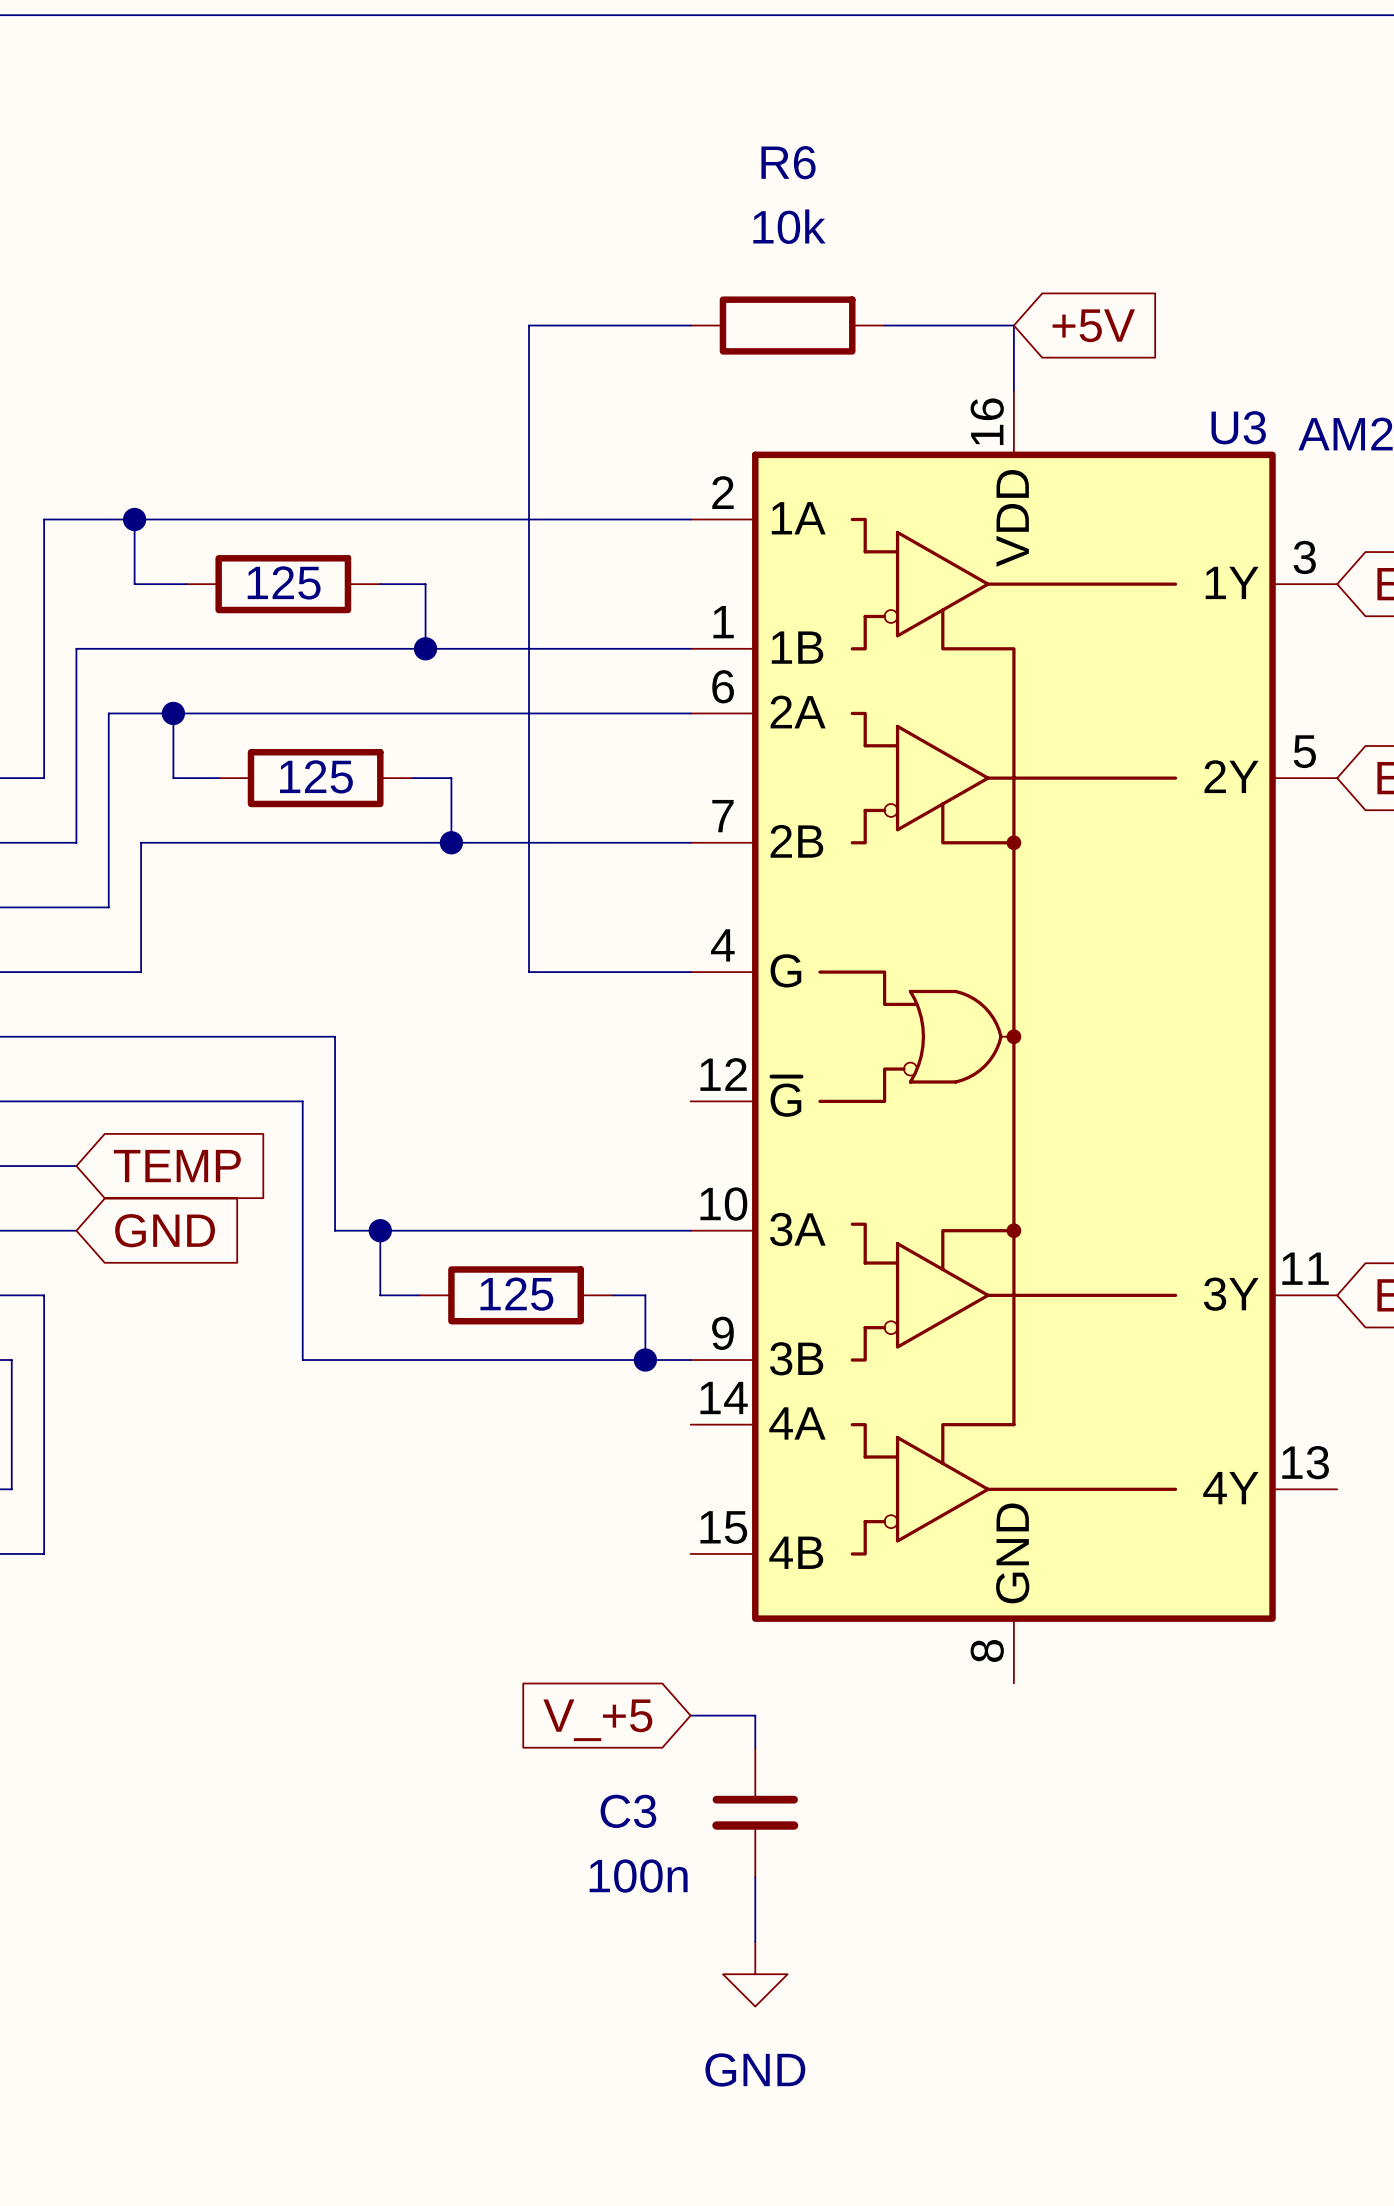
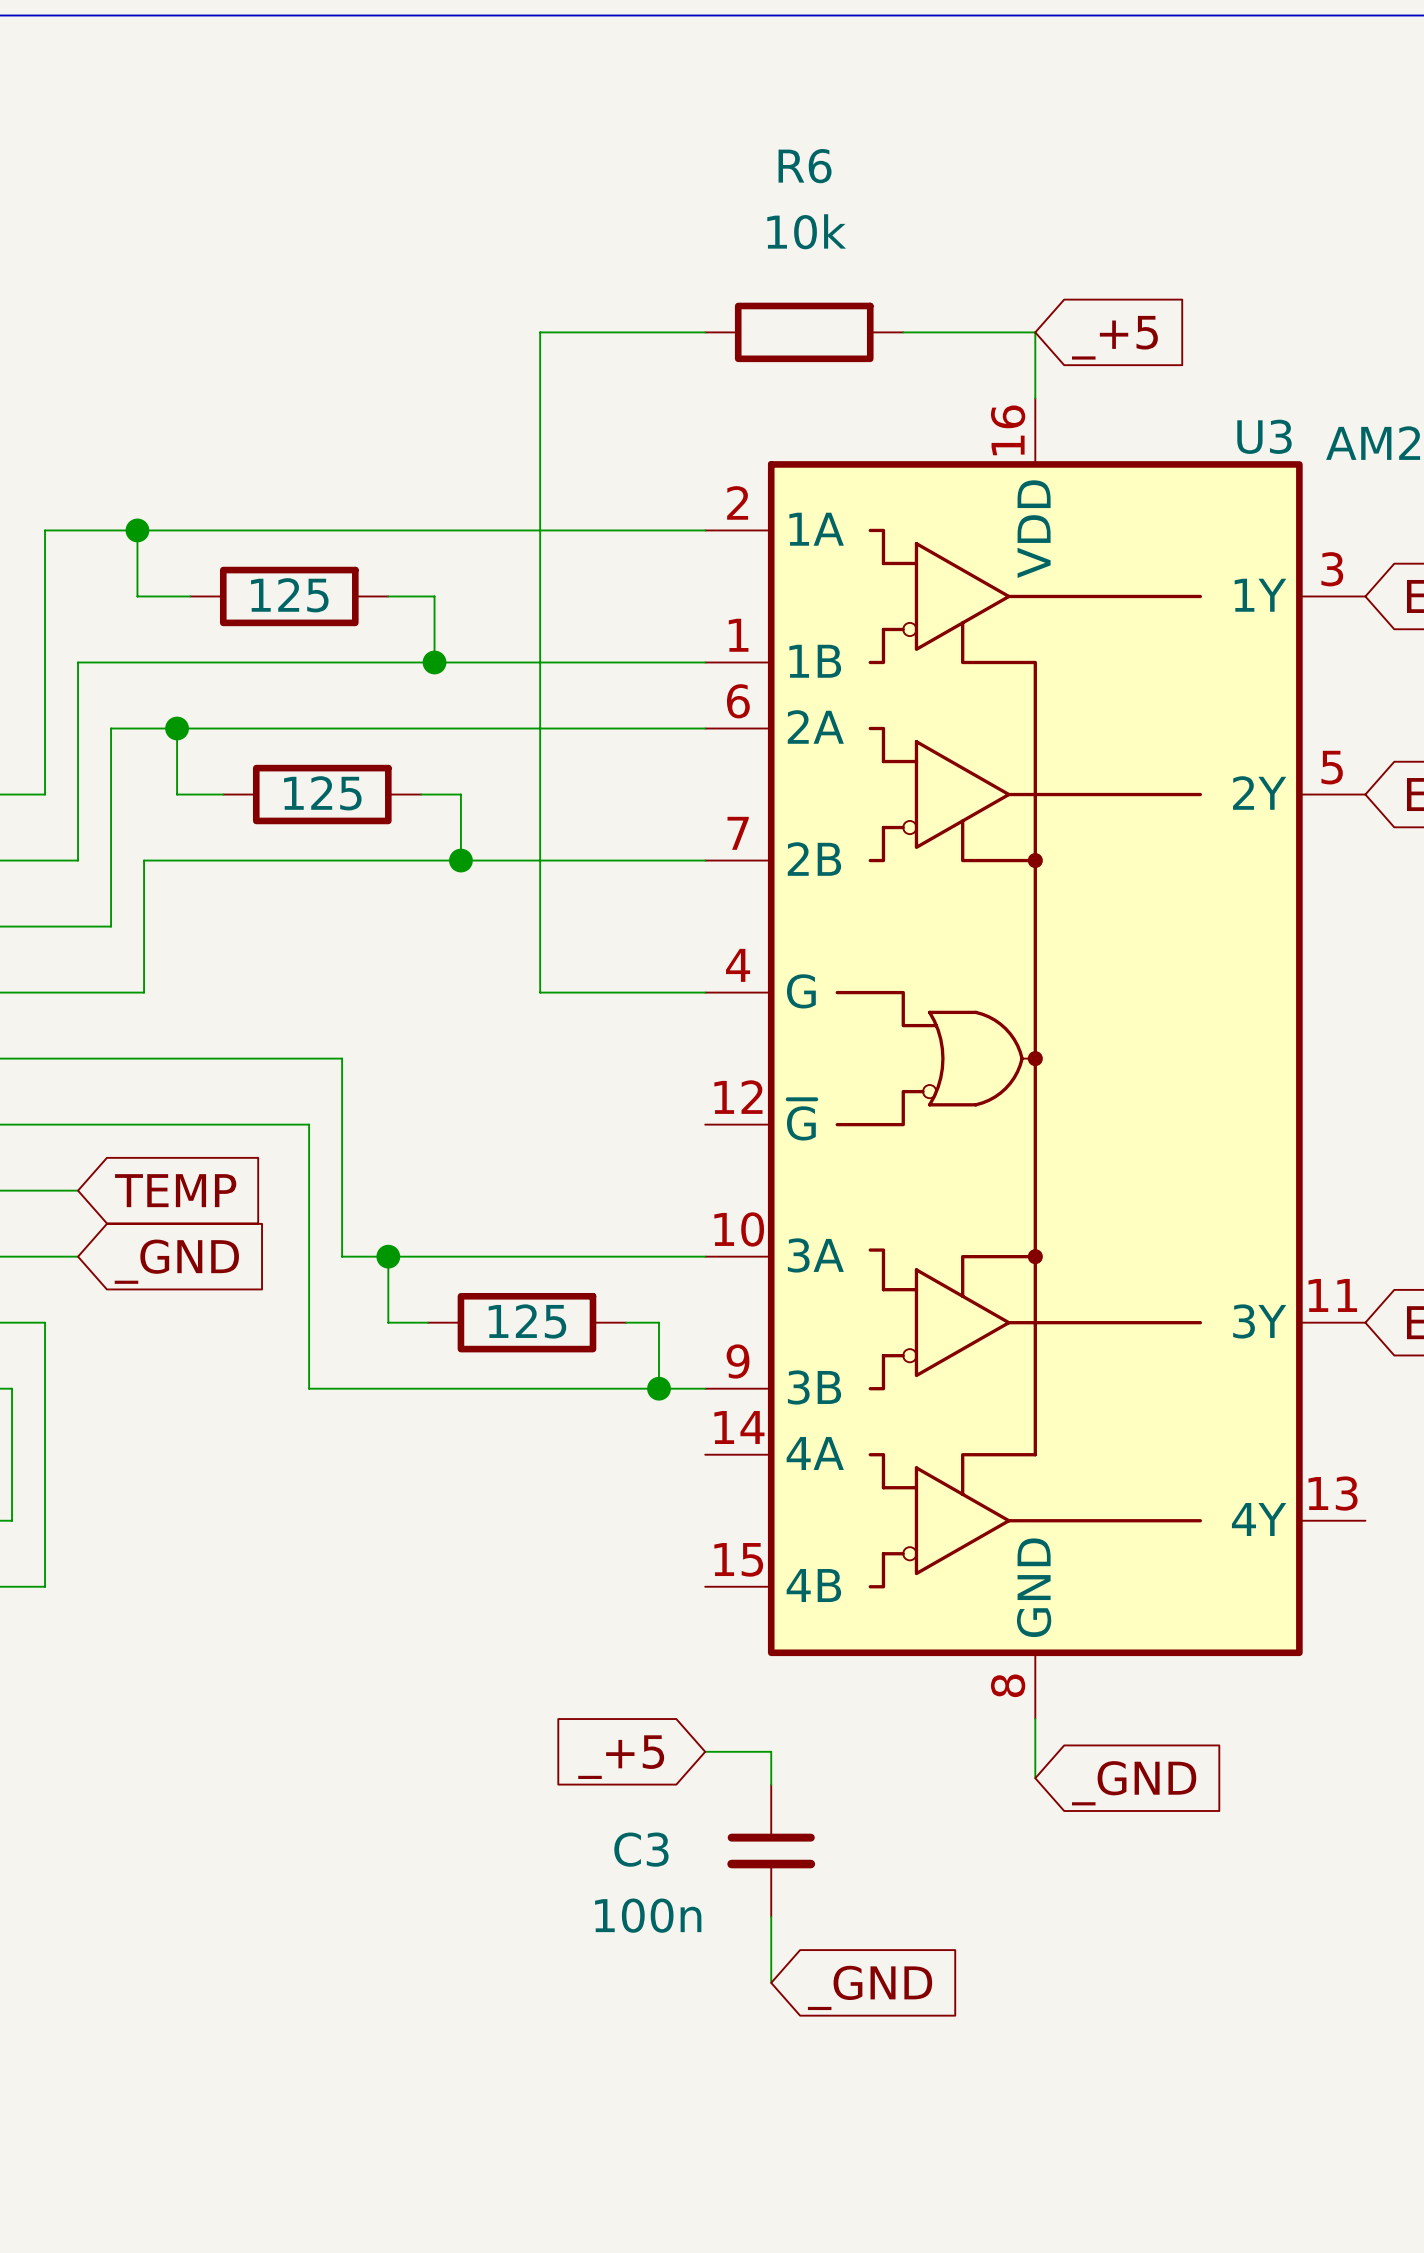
global label: +5V (1093, 325) -> _+5 (1114, 337)
global label: GND (165, 1230) -> _GND (176, 1261)
wire: none -> (1035, 1718) (1035, 1778)
global label: V_+5 (597, 1720) -> _+5 (621, 1757)
global label: none -> _GND (1134, 1783)
global label: none -> _GND (870, 1987)
power symbol: GND (755, 1974) -> none

